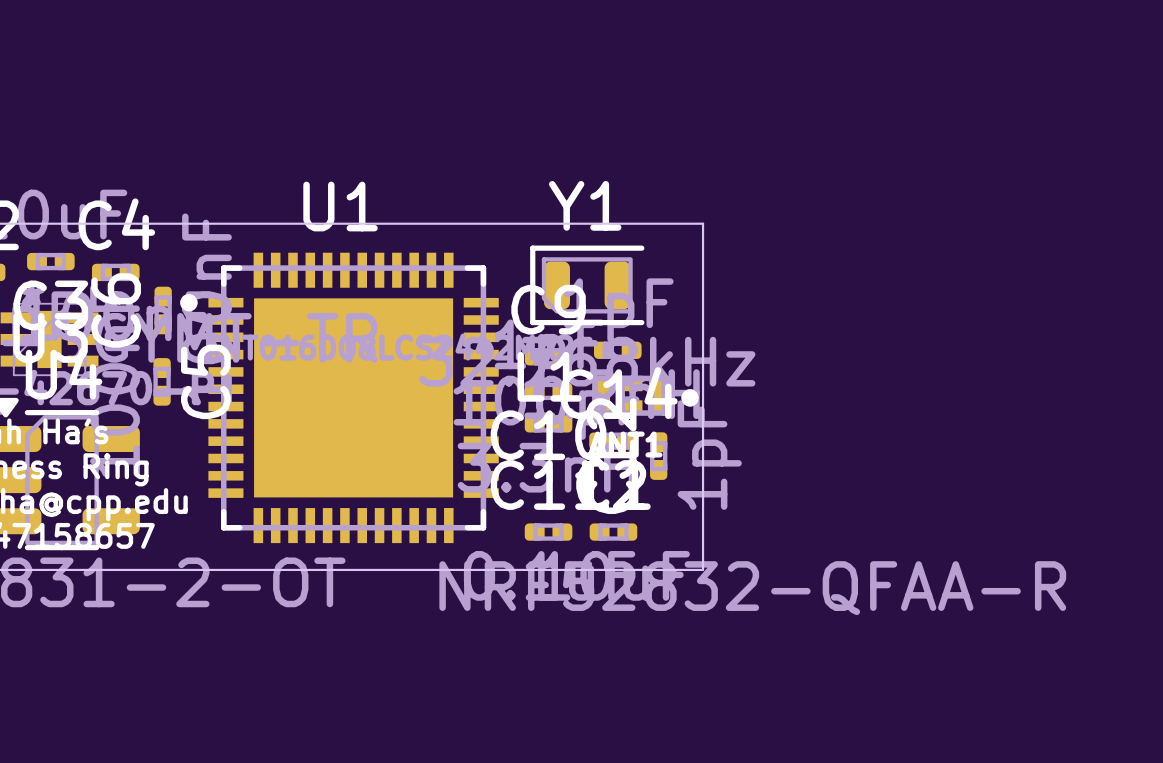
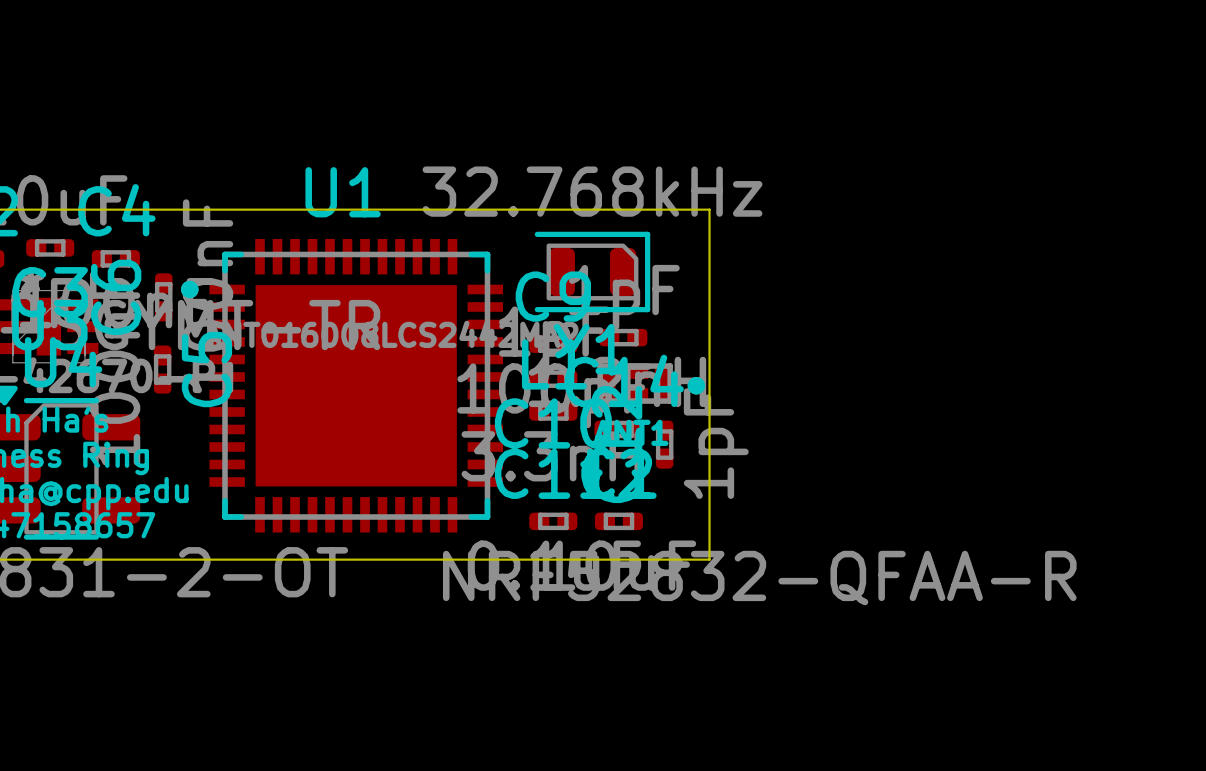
Y1 rotation: 0° (587, 285) -> 180° (592, 271)

